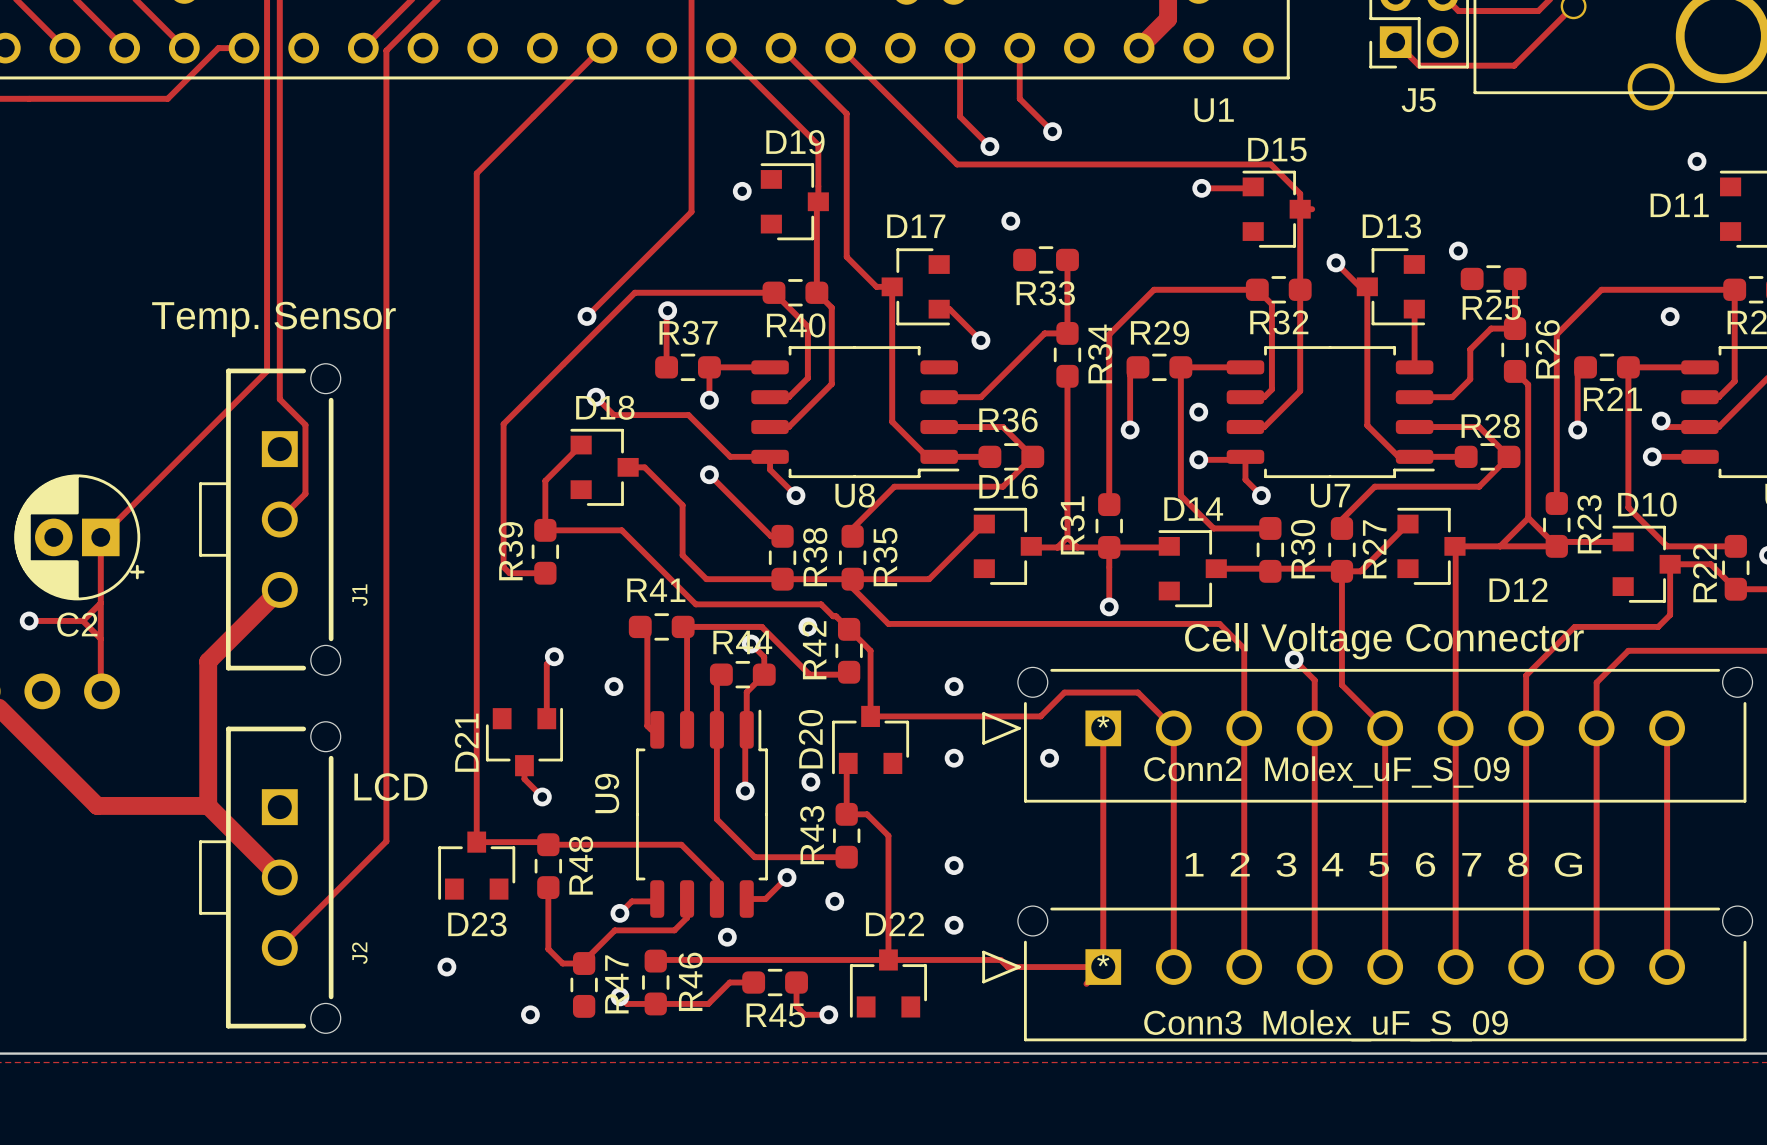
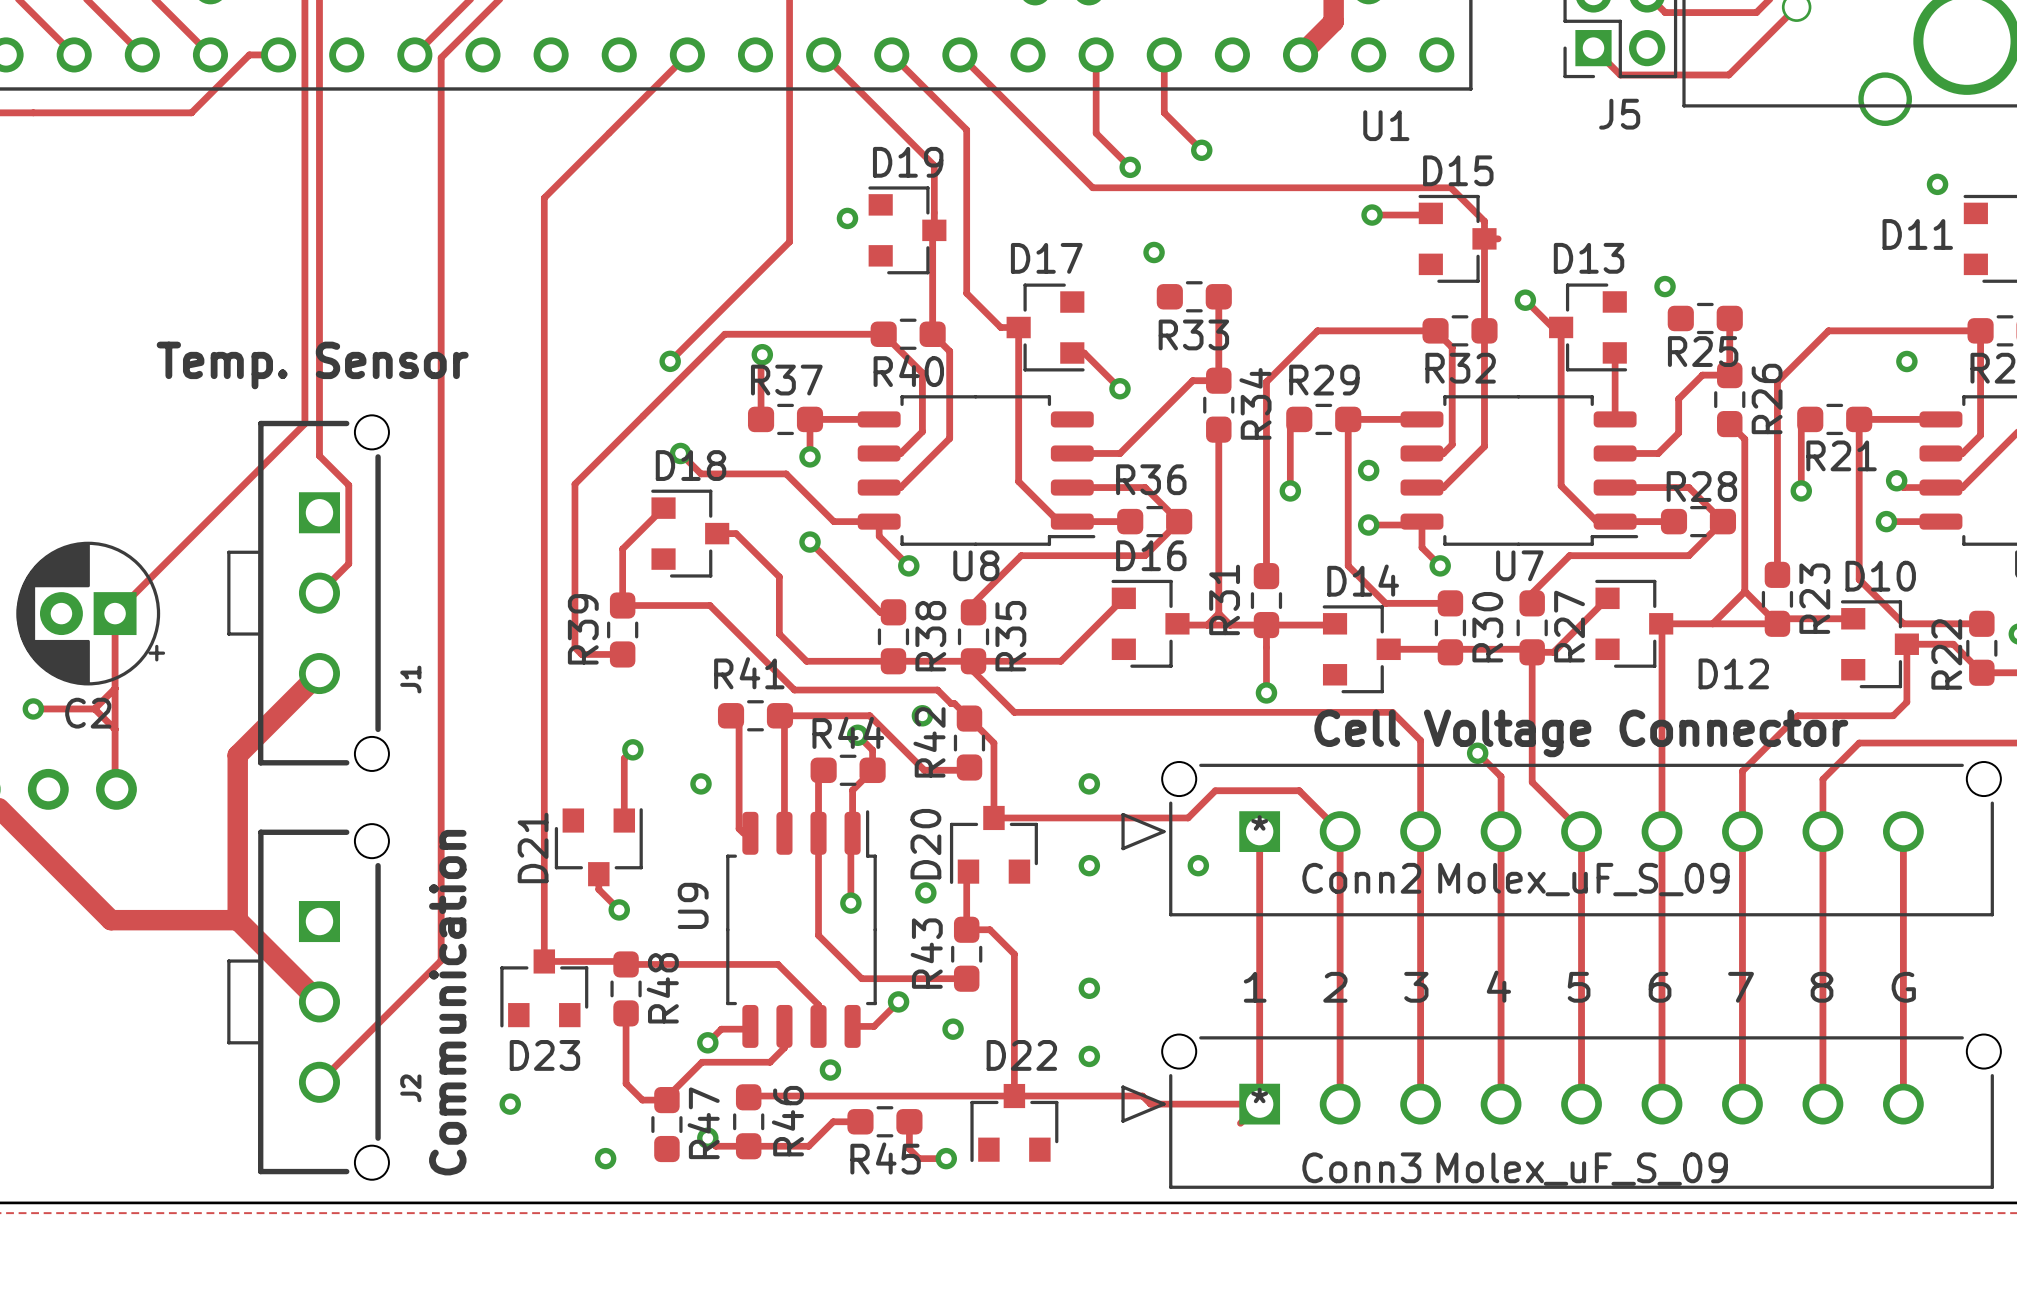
text: LCD (390, 787) -> none
text: none -> Communication (447, 1002)

